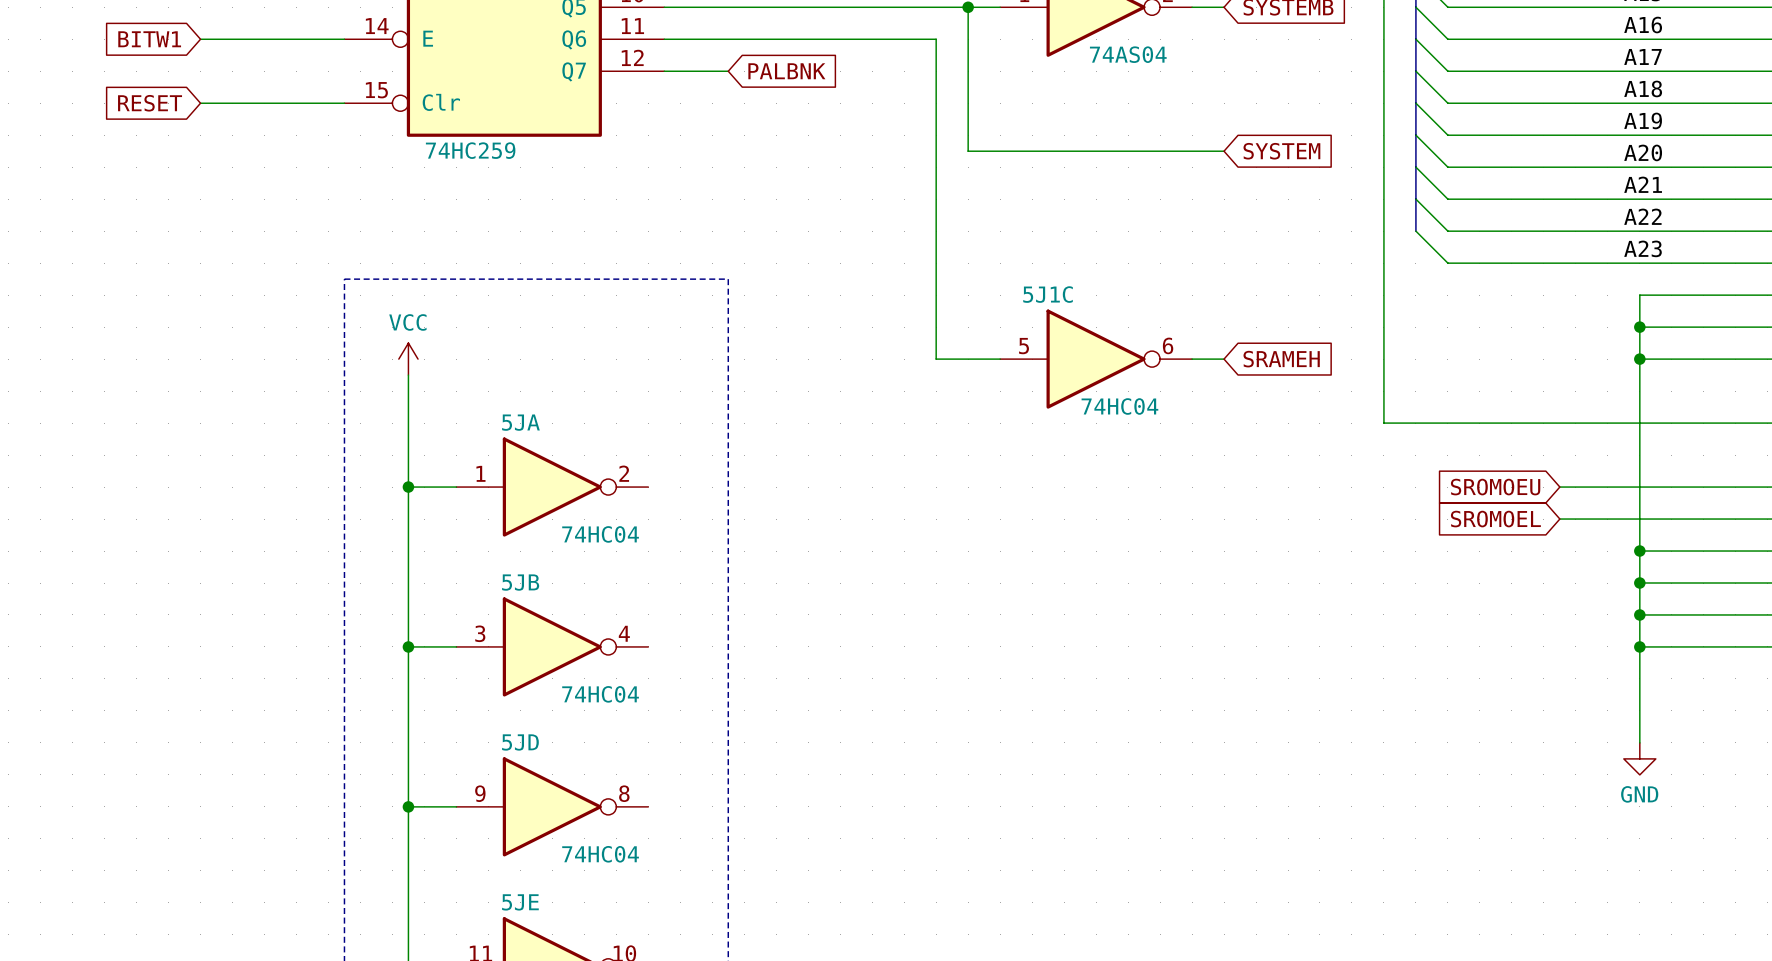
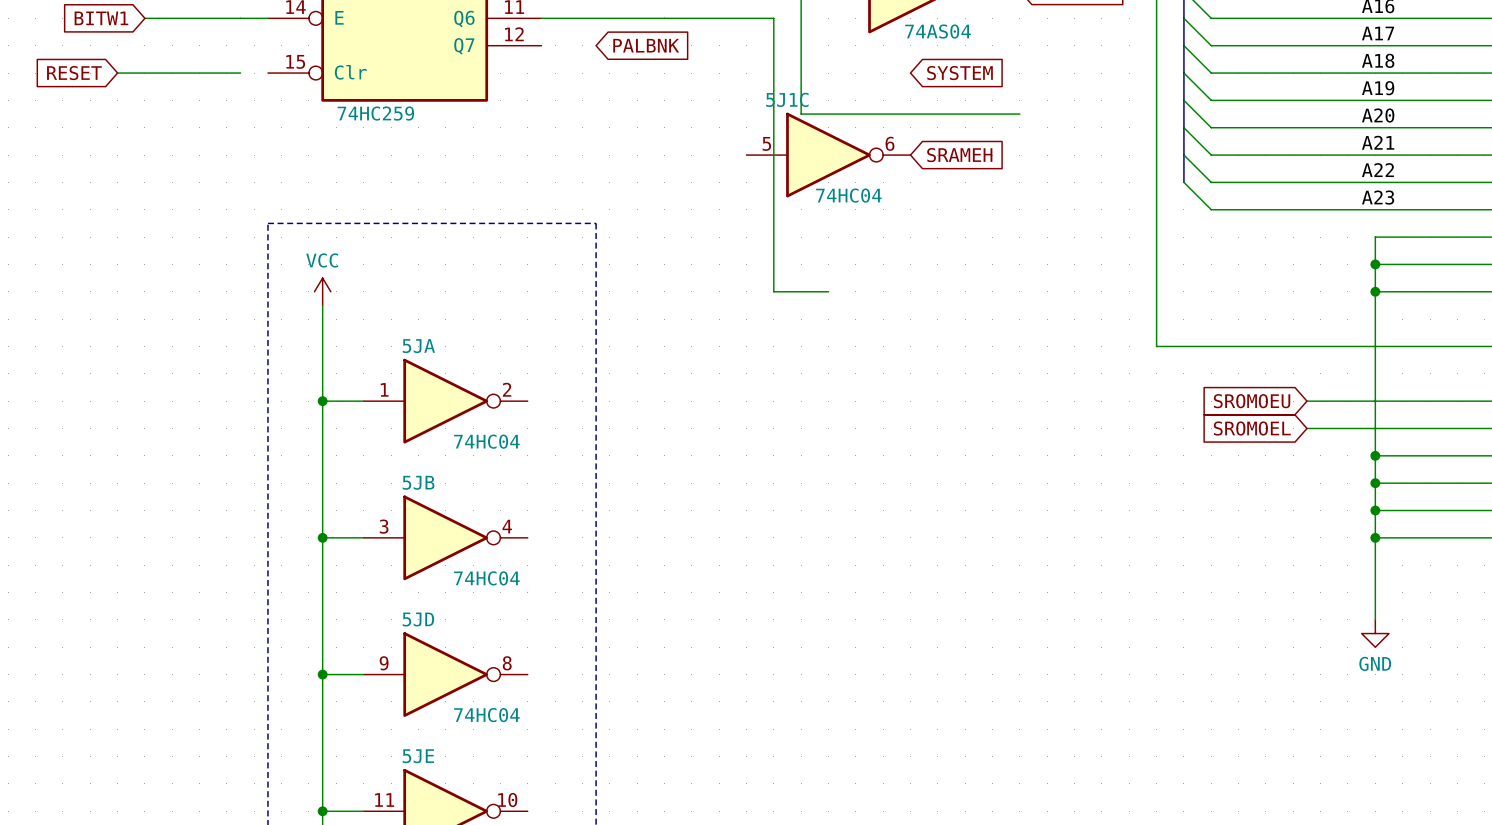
wire: (664, 71) (728, 71) -> none
global label position: RESET (150, 103) -> RESET (74, 73)
wire: (312, 103) (344, 103) -> (117, 73) (144, 73)
global label position: SYSTEM (1281, 151) -> SYSTEM (960, 73)
5J1C position: (1096, 359) -> (828, 155)
wire: (1192, 359) (1224, 359) -> none
global label position: SRAMEH (1281, 359) -> SRAMEH (959, 155)

